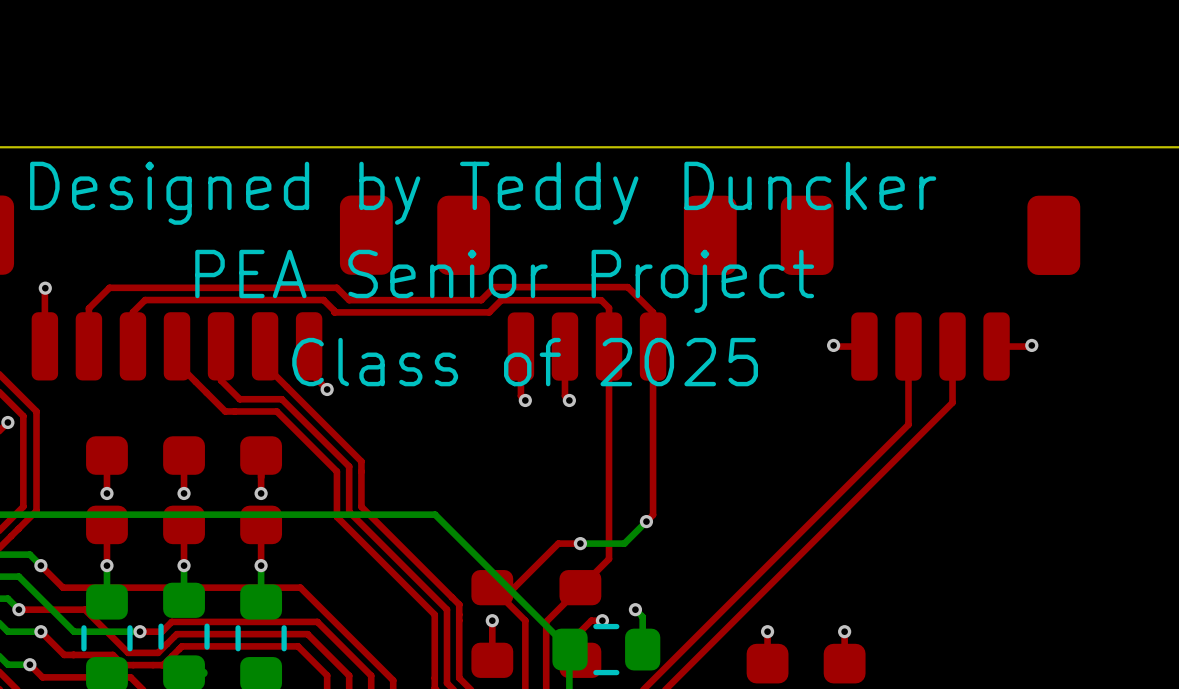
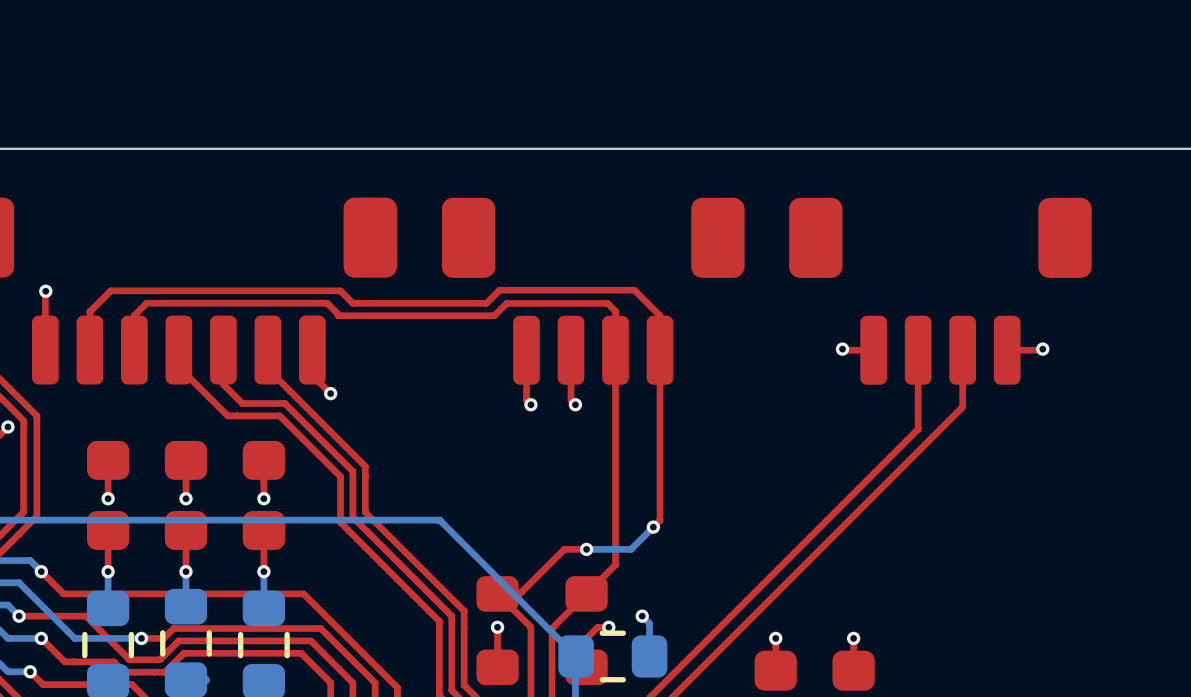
text: Designed by Teddy Duncker (483, 193) -> none
text: PEA Senior Project (504, 281) -> none
text: Class of 2025 (525, 362) -> none

